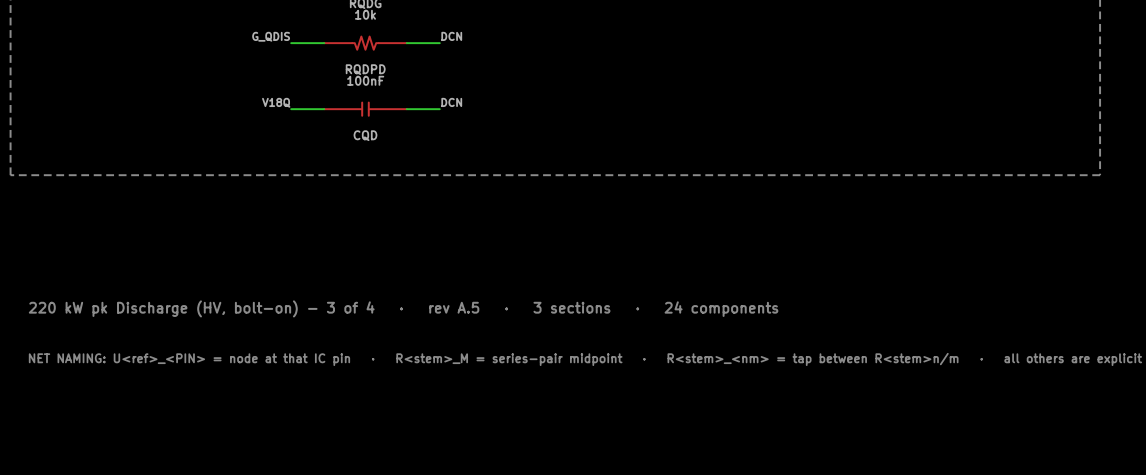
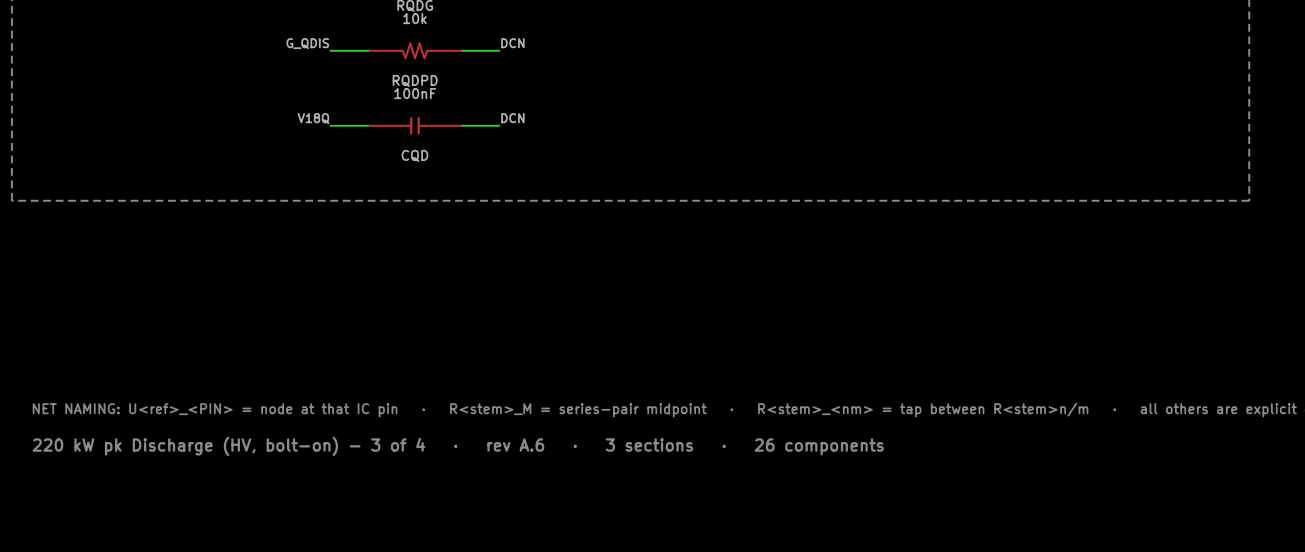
text: 220 kW pk Discharge (HV, bolt-on) - 3 of 4 · rev A.5 · 3 sections · 24 components (403, 308) -> none
text: none -> 220 kW pk Discharge (HV, bolt-on) - 3 of 4 · rev A.6 · 3 sections · 26 components (458, 446)

